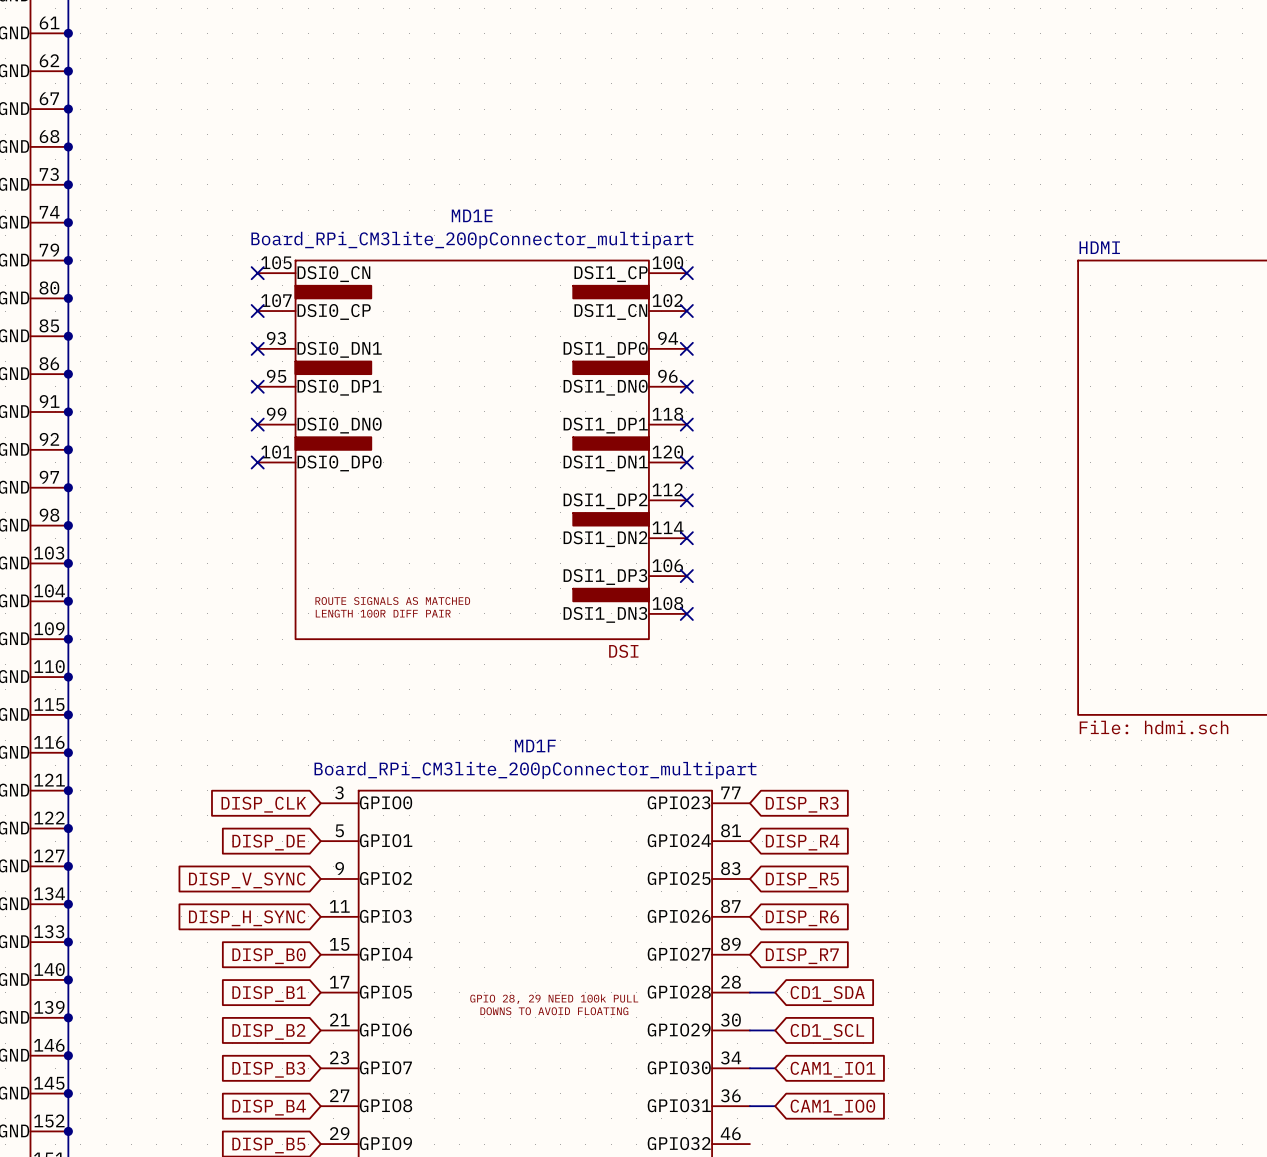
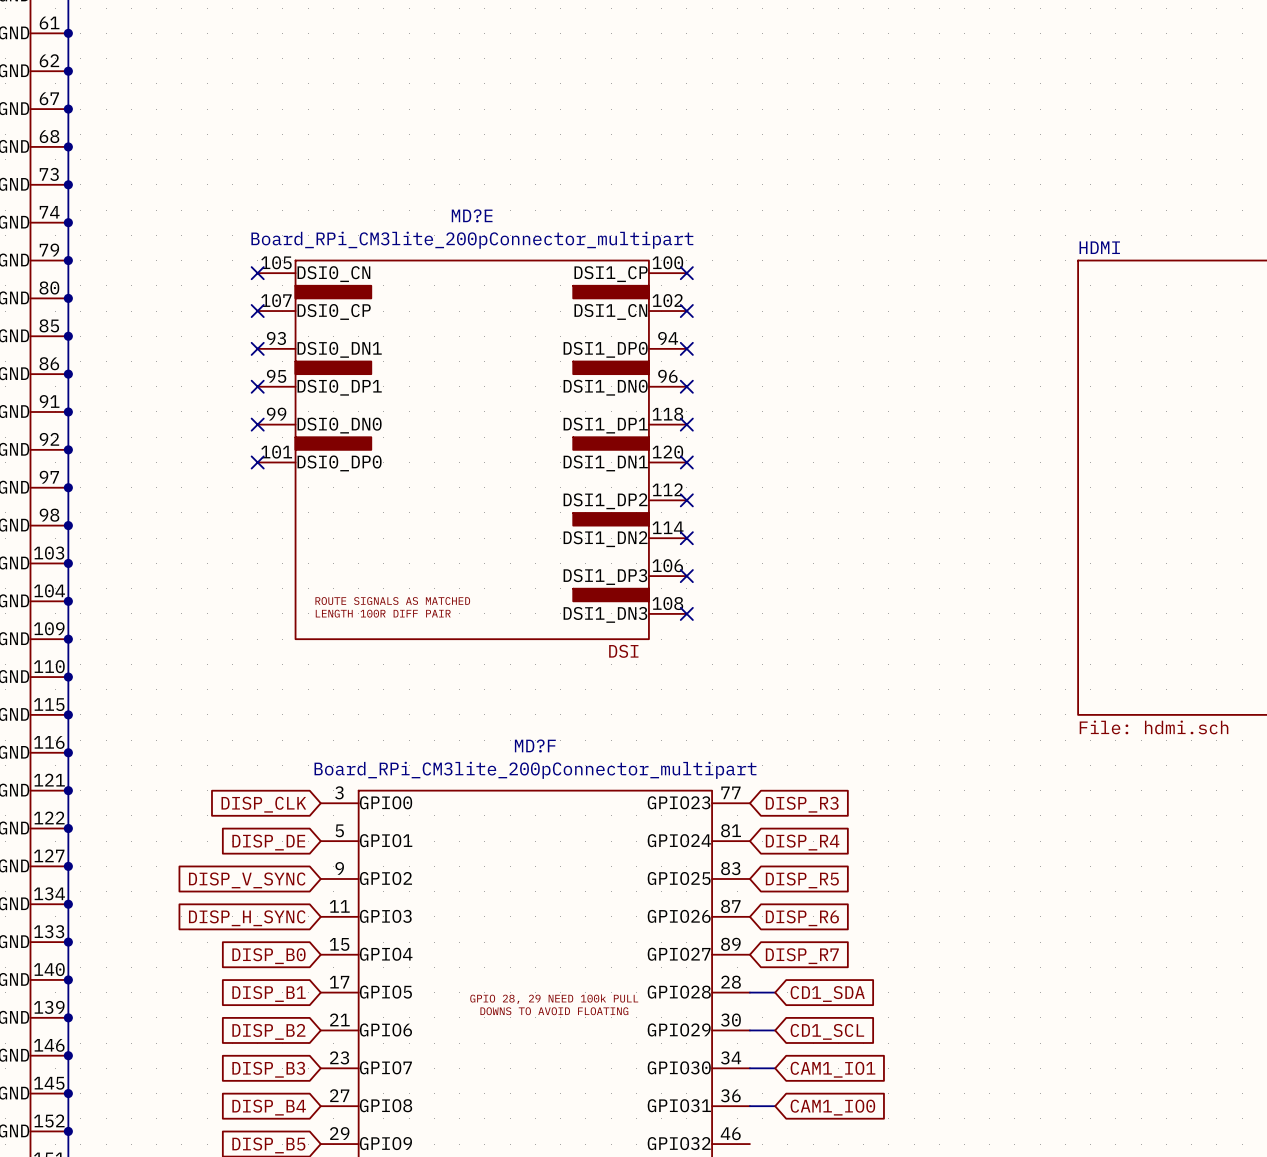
MD1E name: MD1E (472, 215) -> MD?E (472, 215)
MD1F name: MD1F (535, 745) -> MD?F (535, 745)

